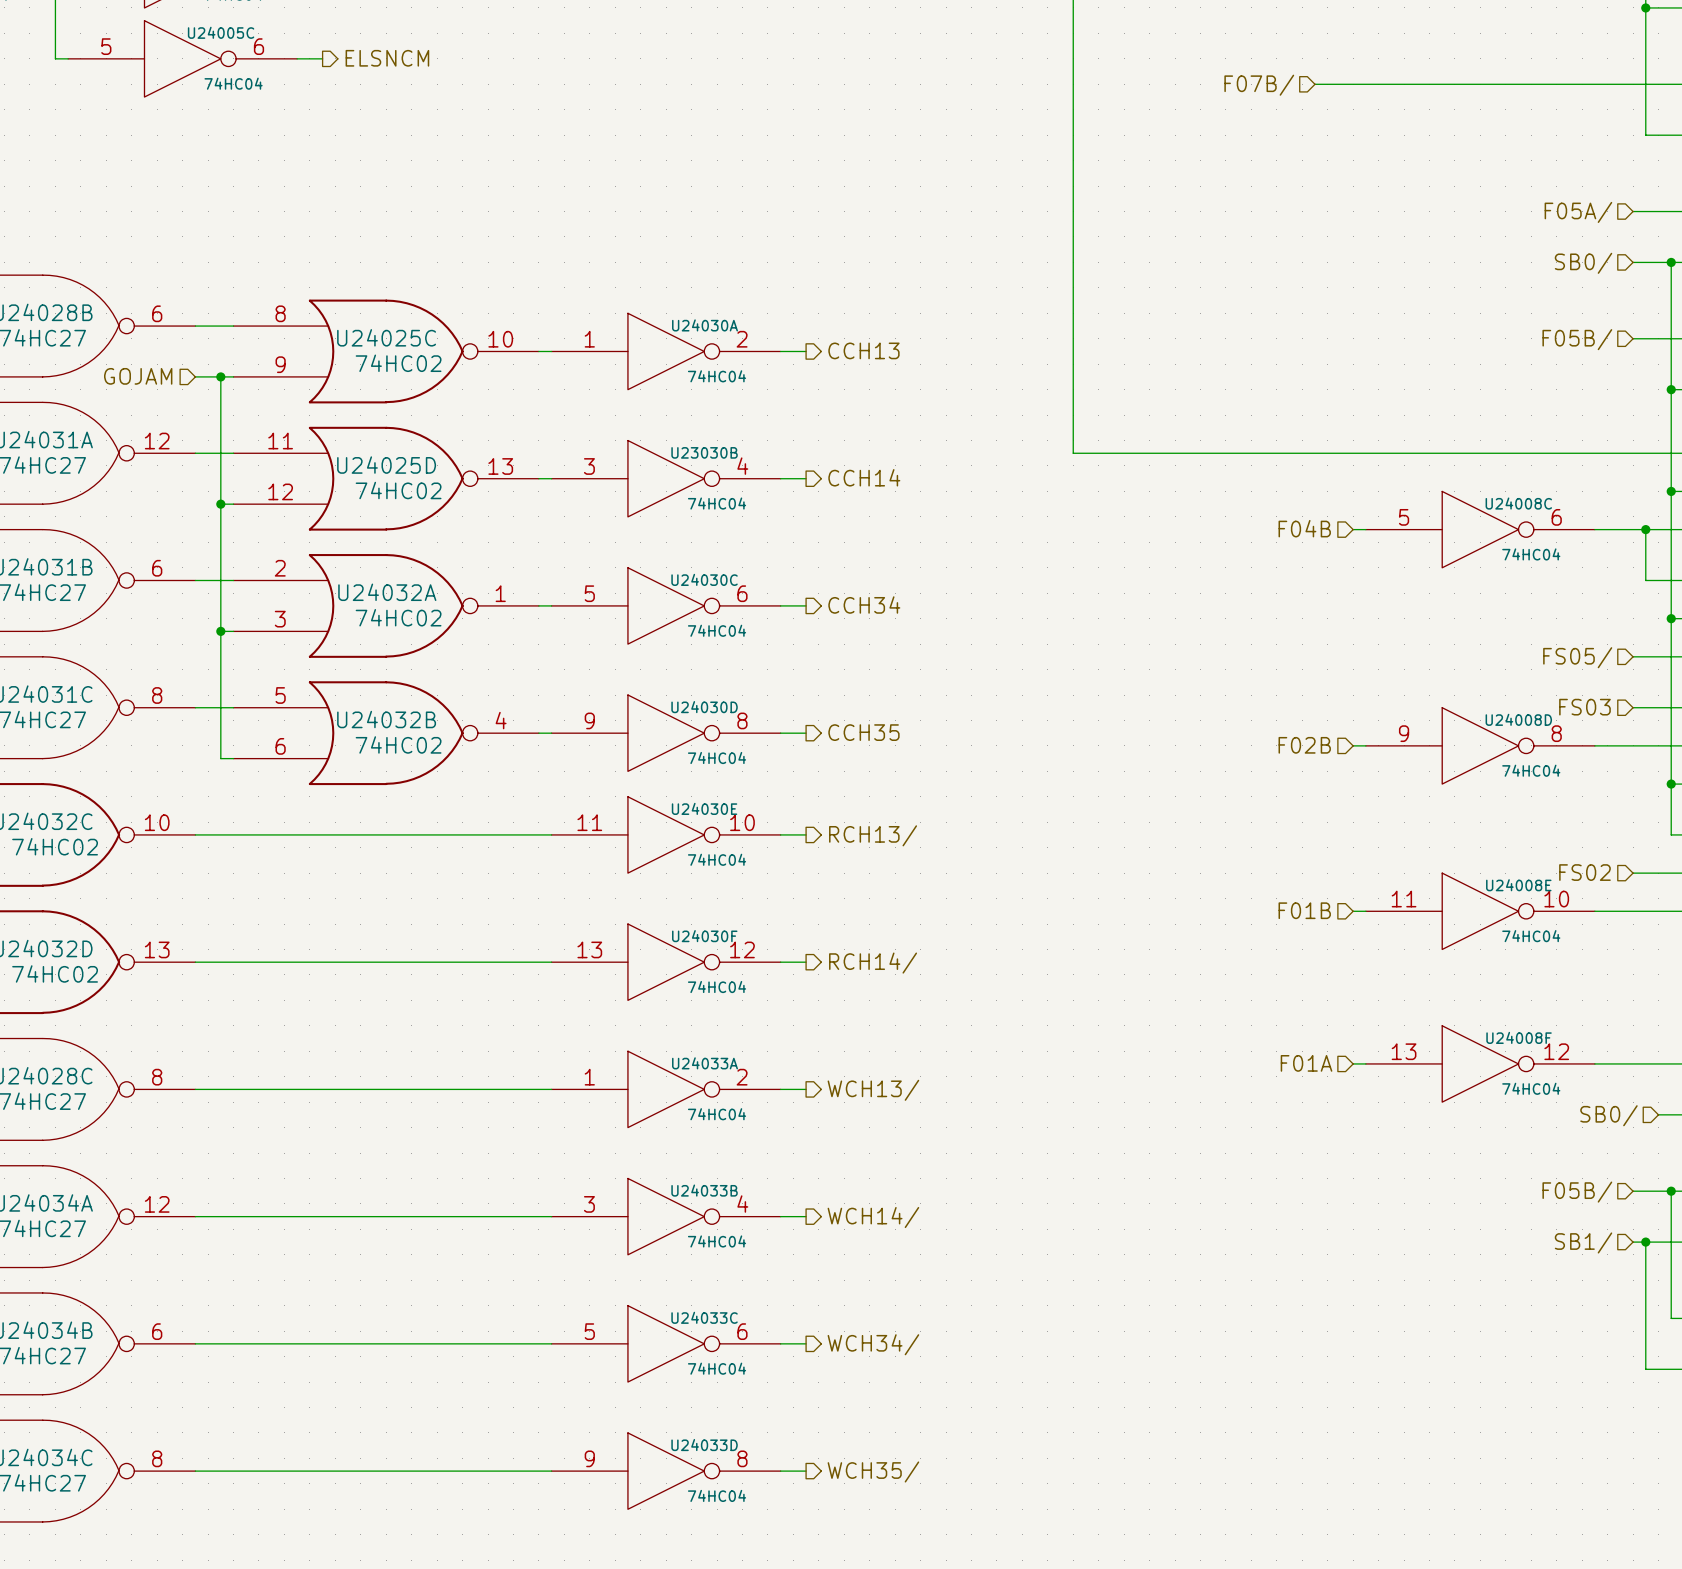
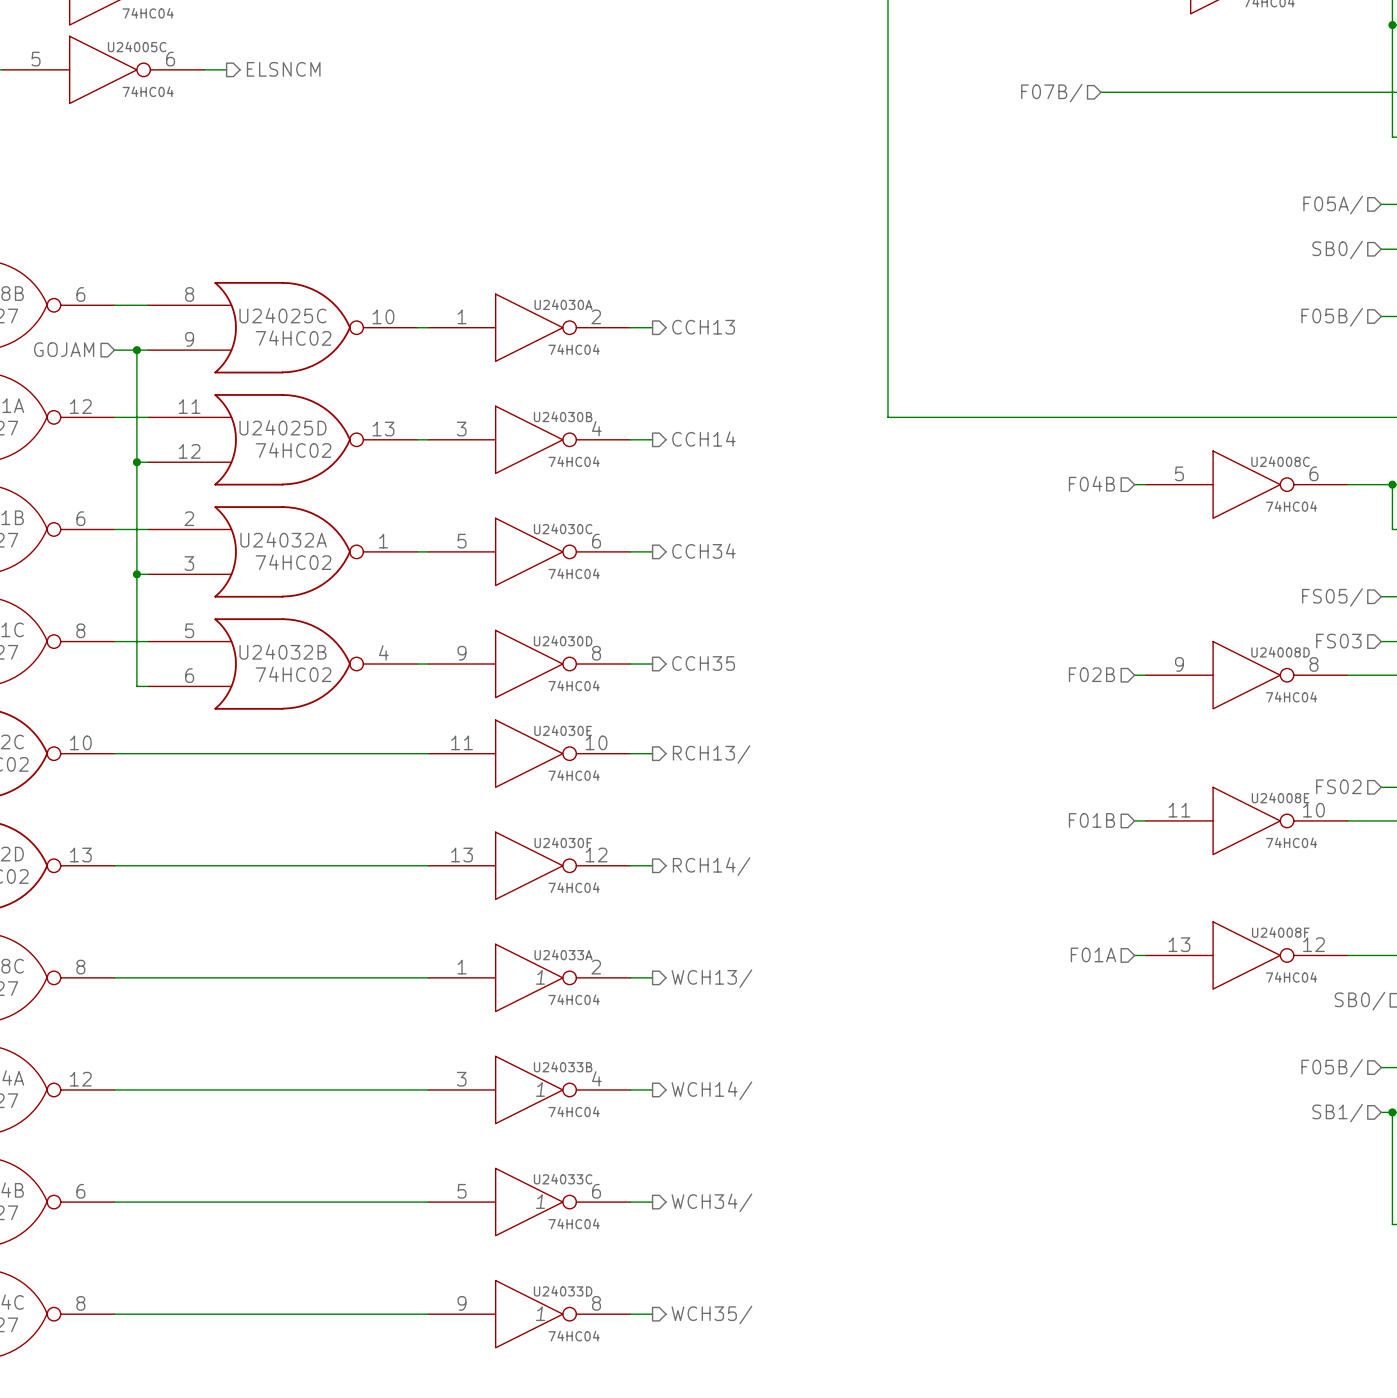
U23030B name: U23030B (704, 452) -> U24030B (563, 416)
U24033A text: none -> 1 (540, 977)
U24033B text: none -> 1 (540, 1089)
U24033C text: none -> 1 (540, 1201)
U24033D text: none -> 1 (540, 1313)

